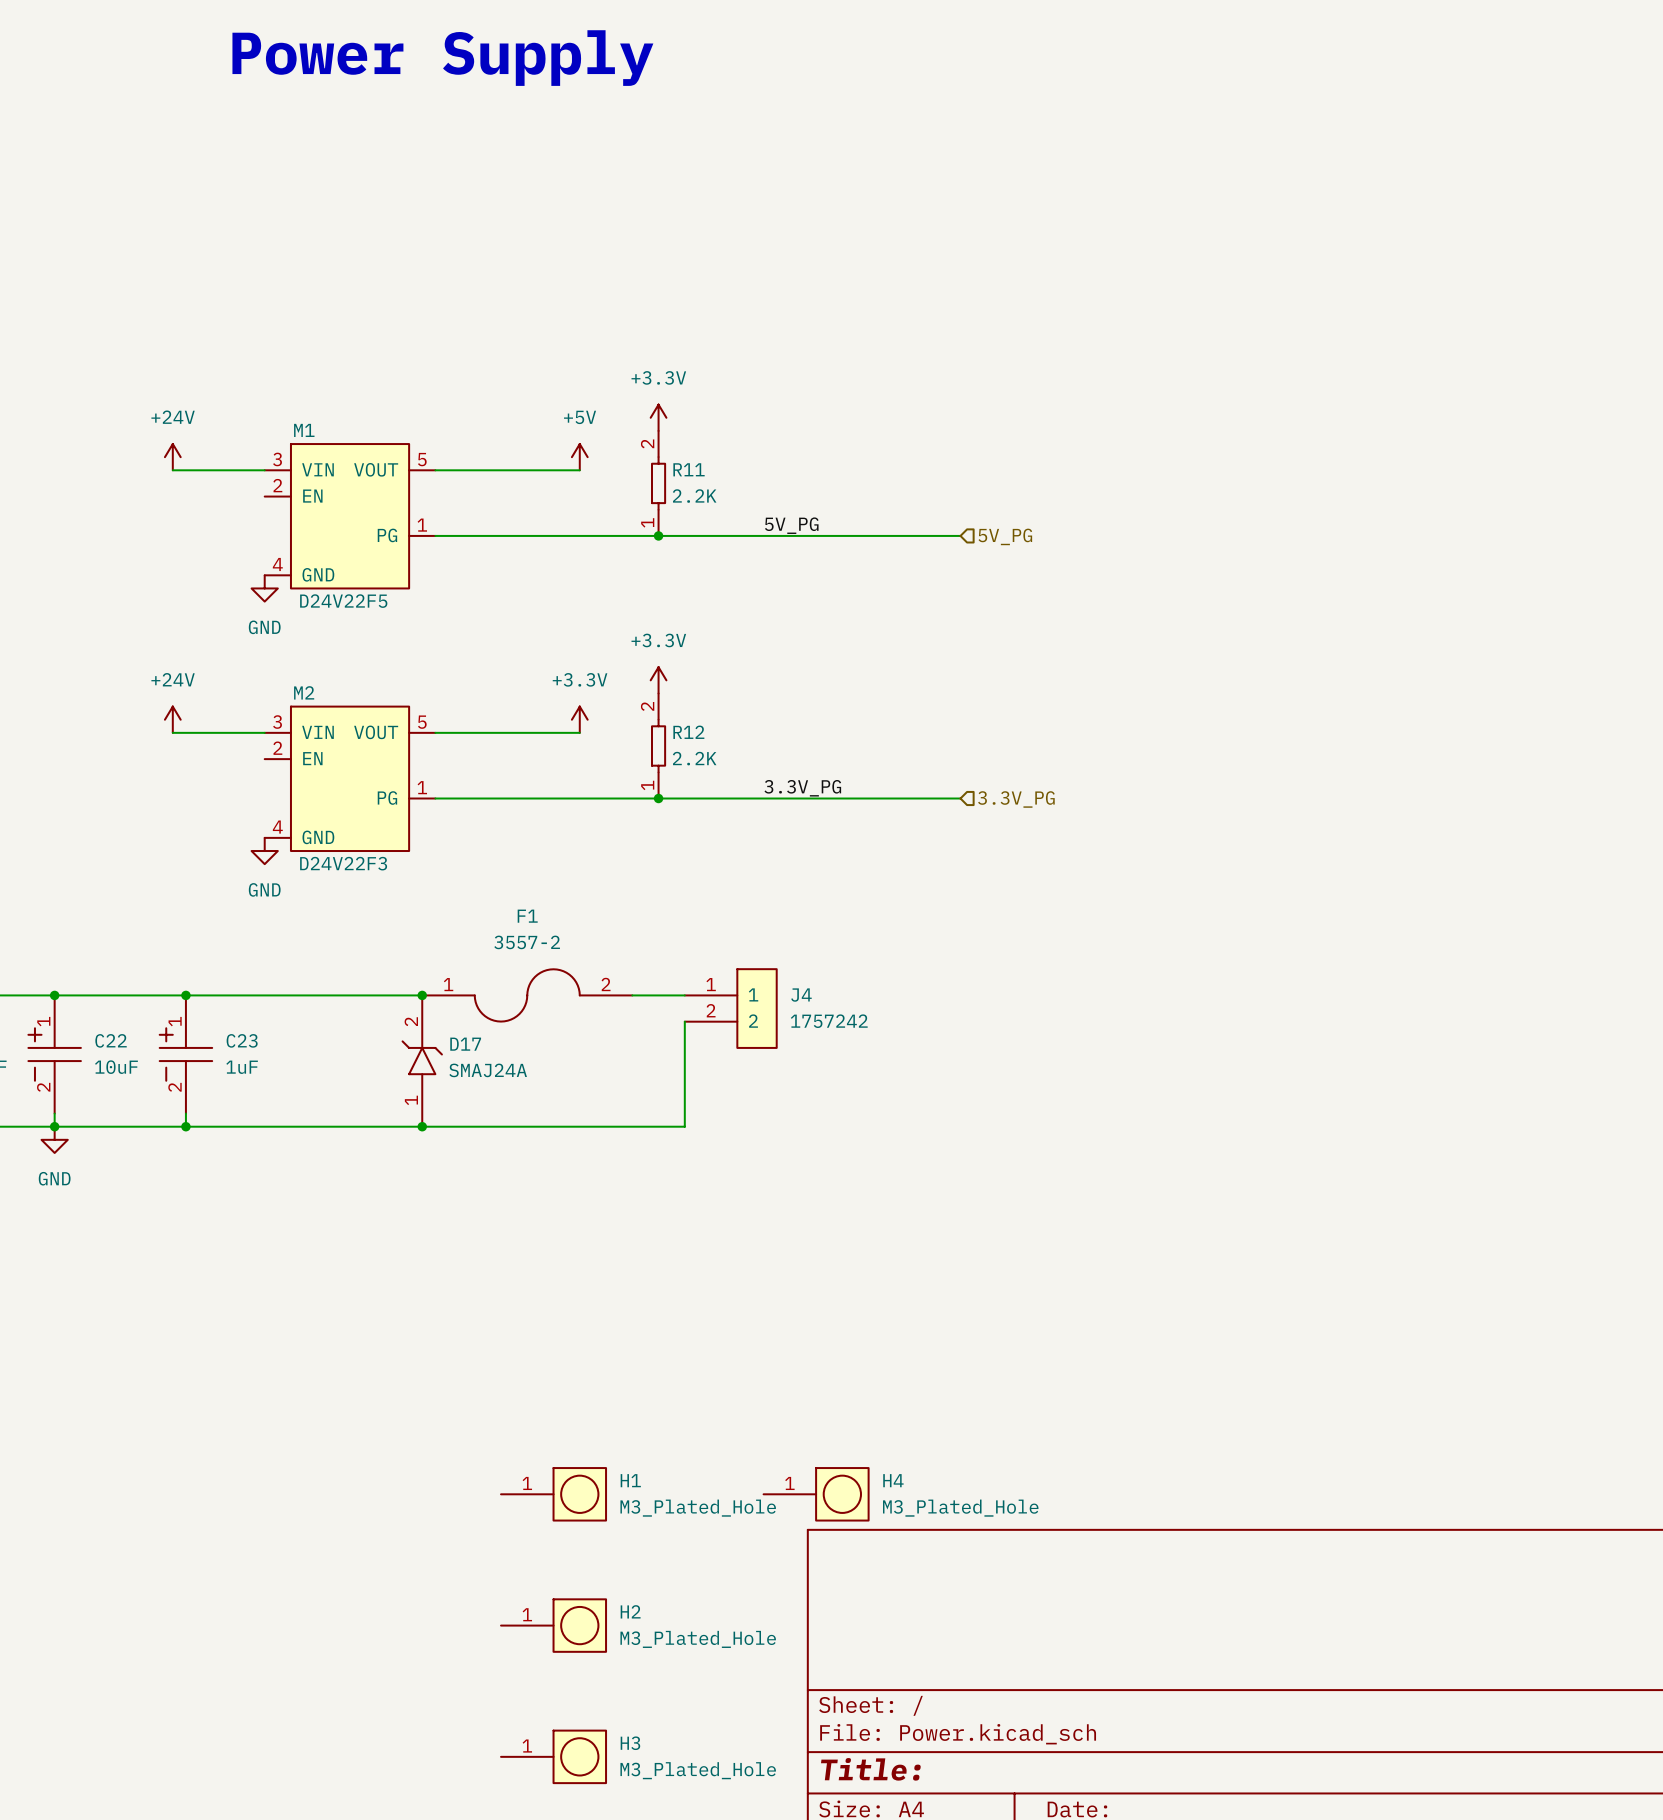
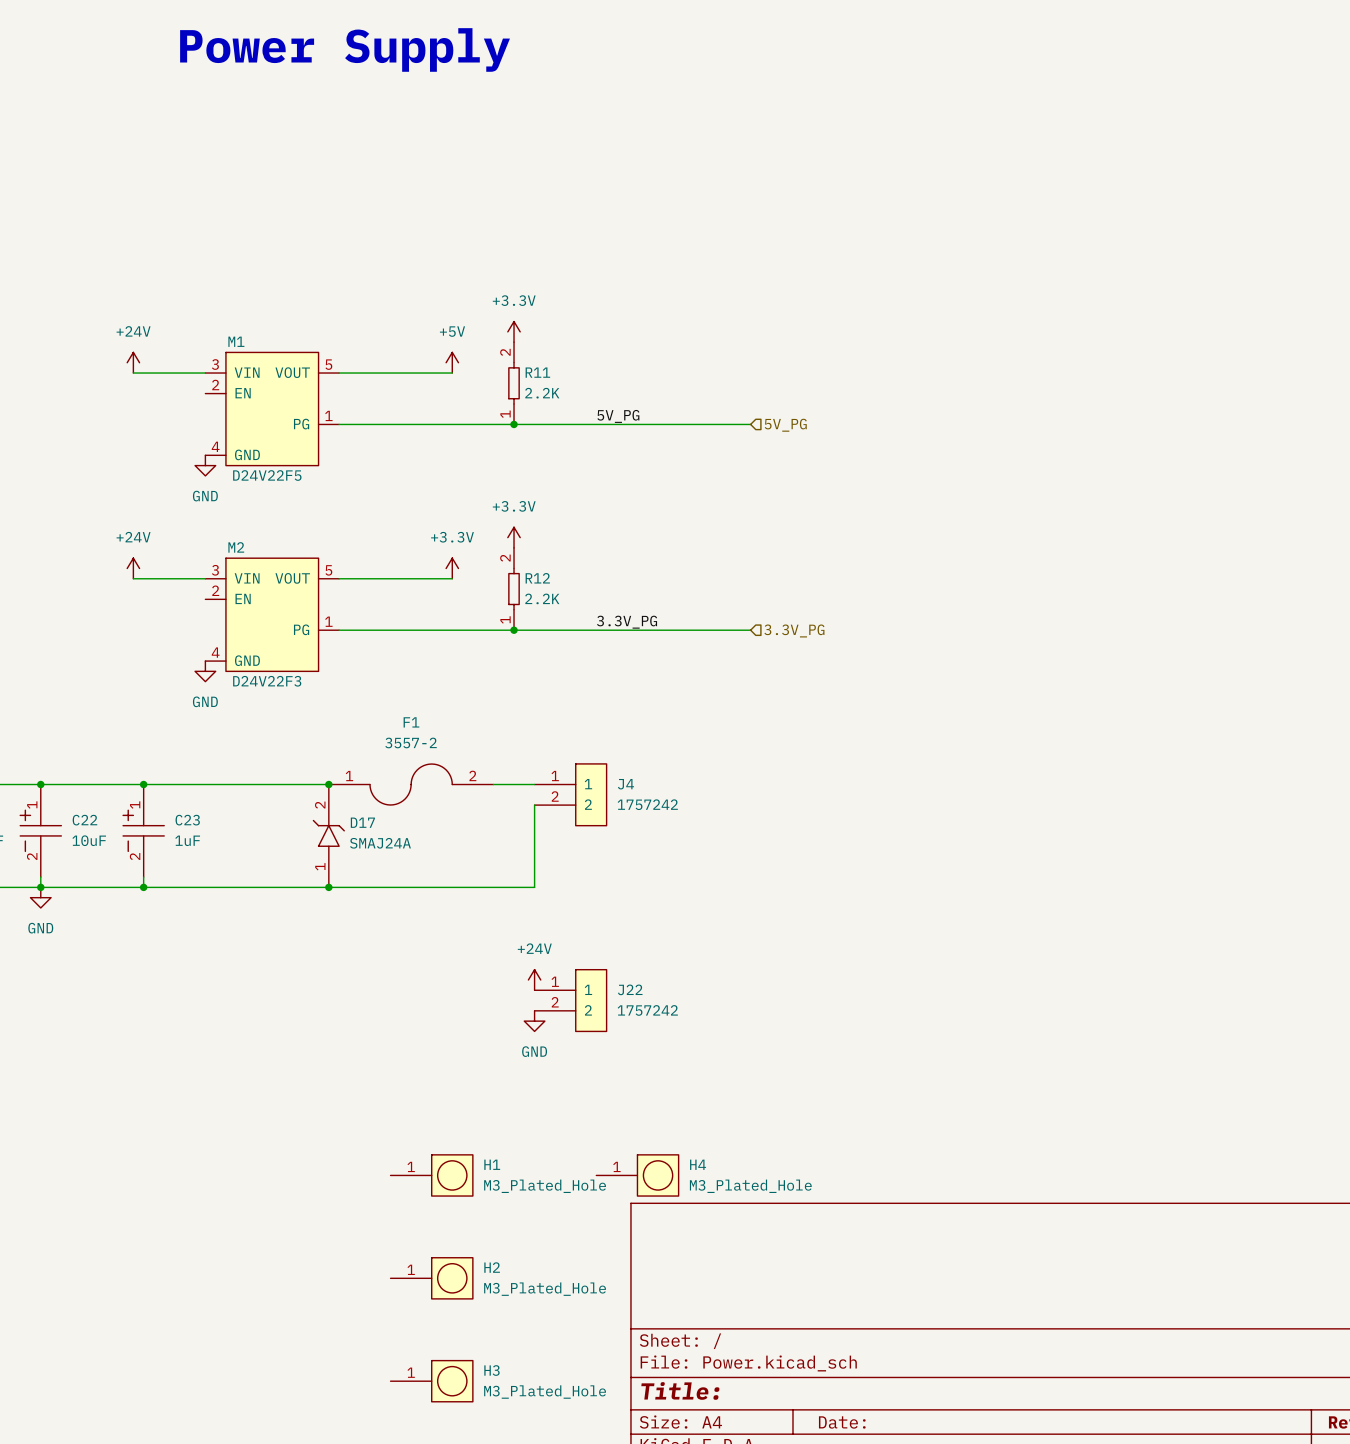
power symbol: none -> +24V (534, 979)
J22: none -> 1757242 (570, 1000)
power symbol: none -> GND (534, 1021)

